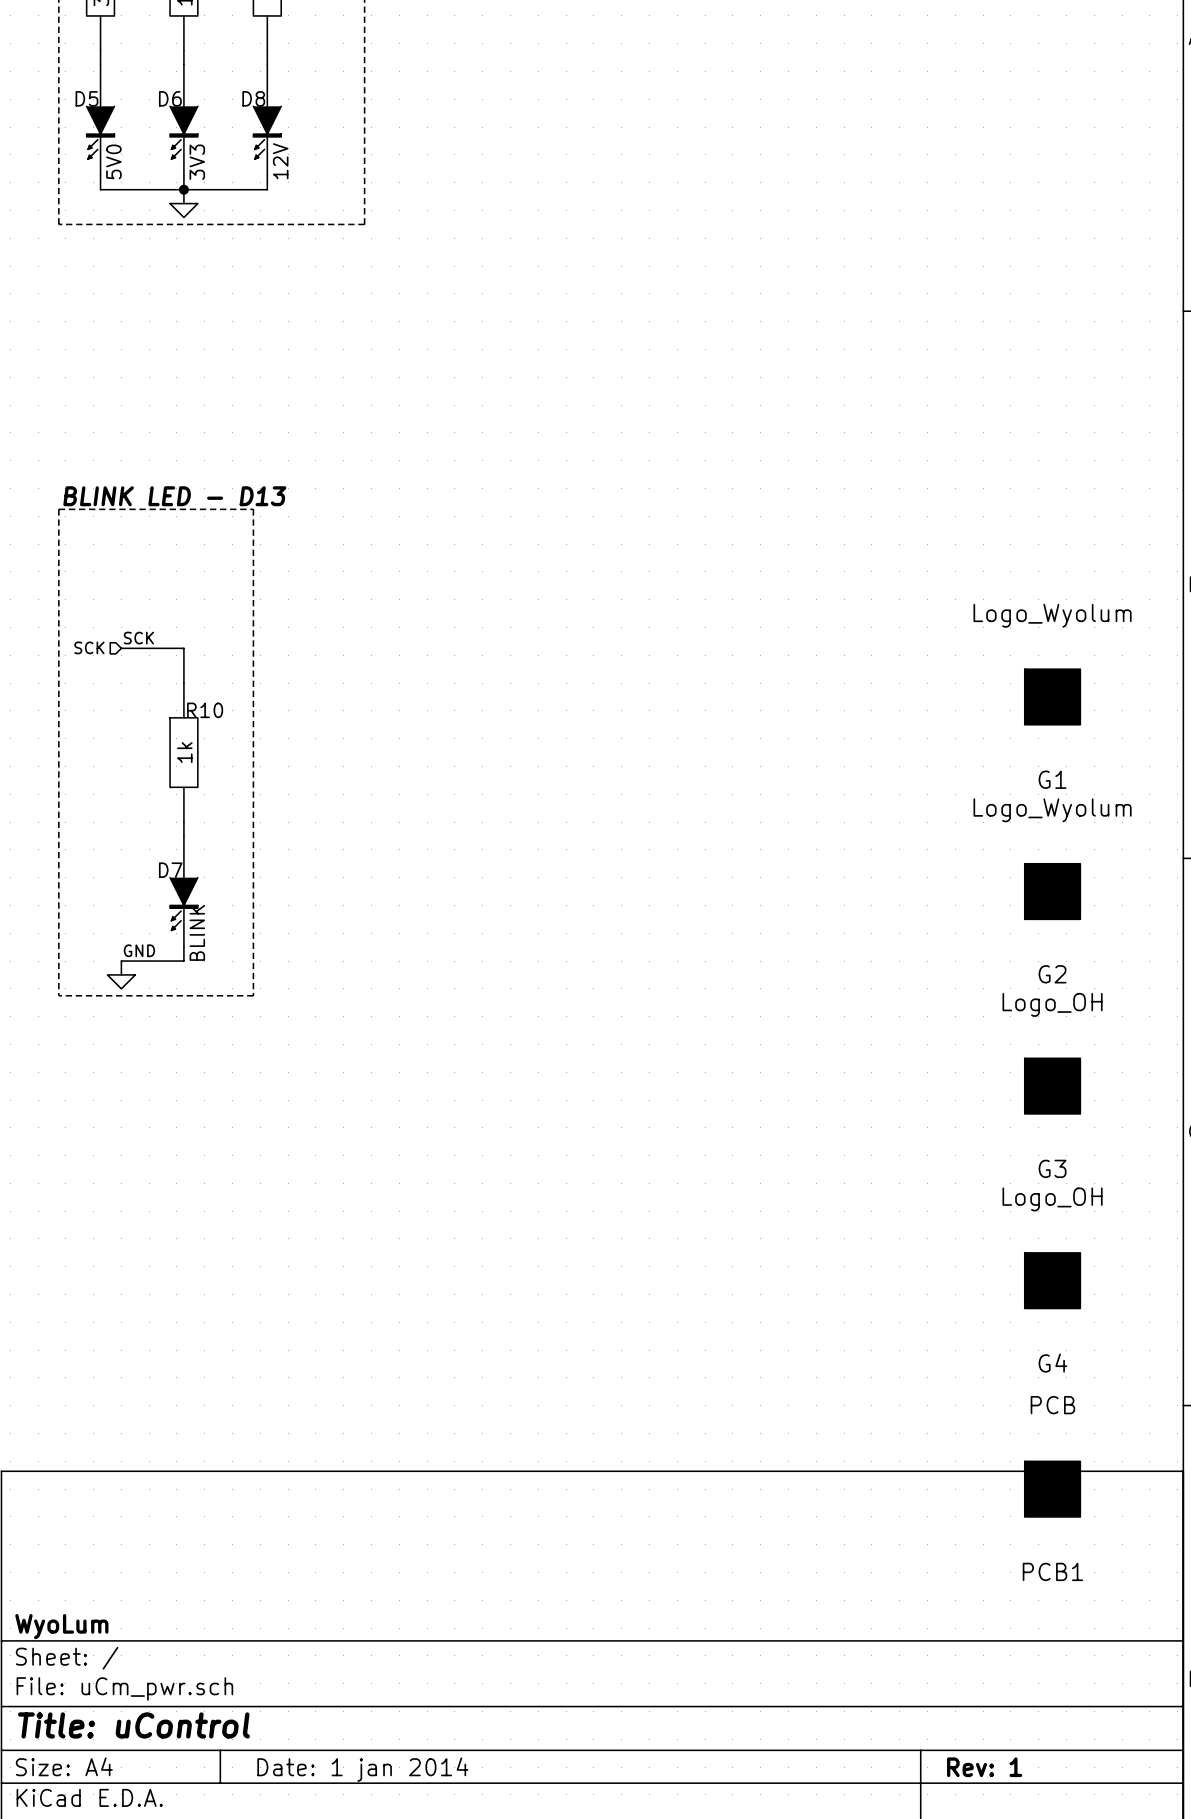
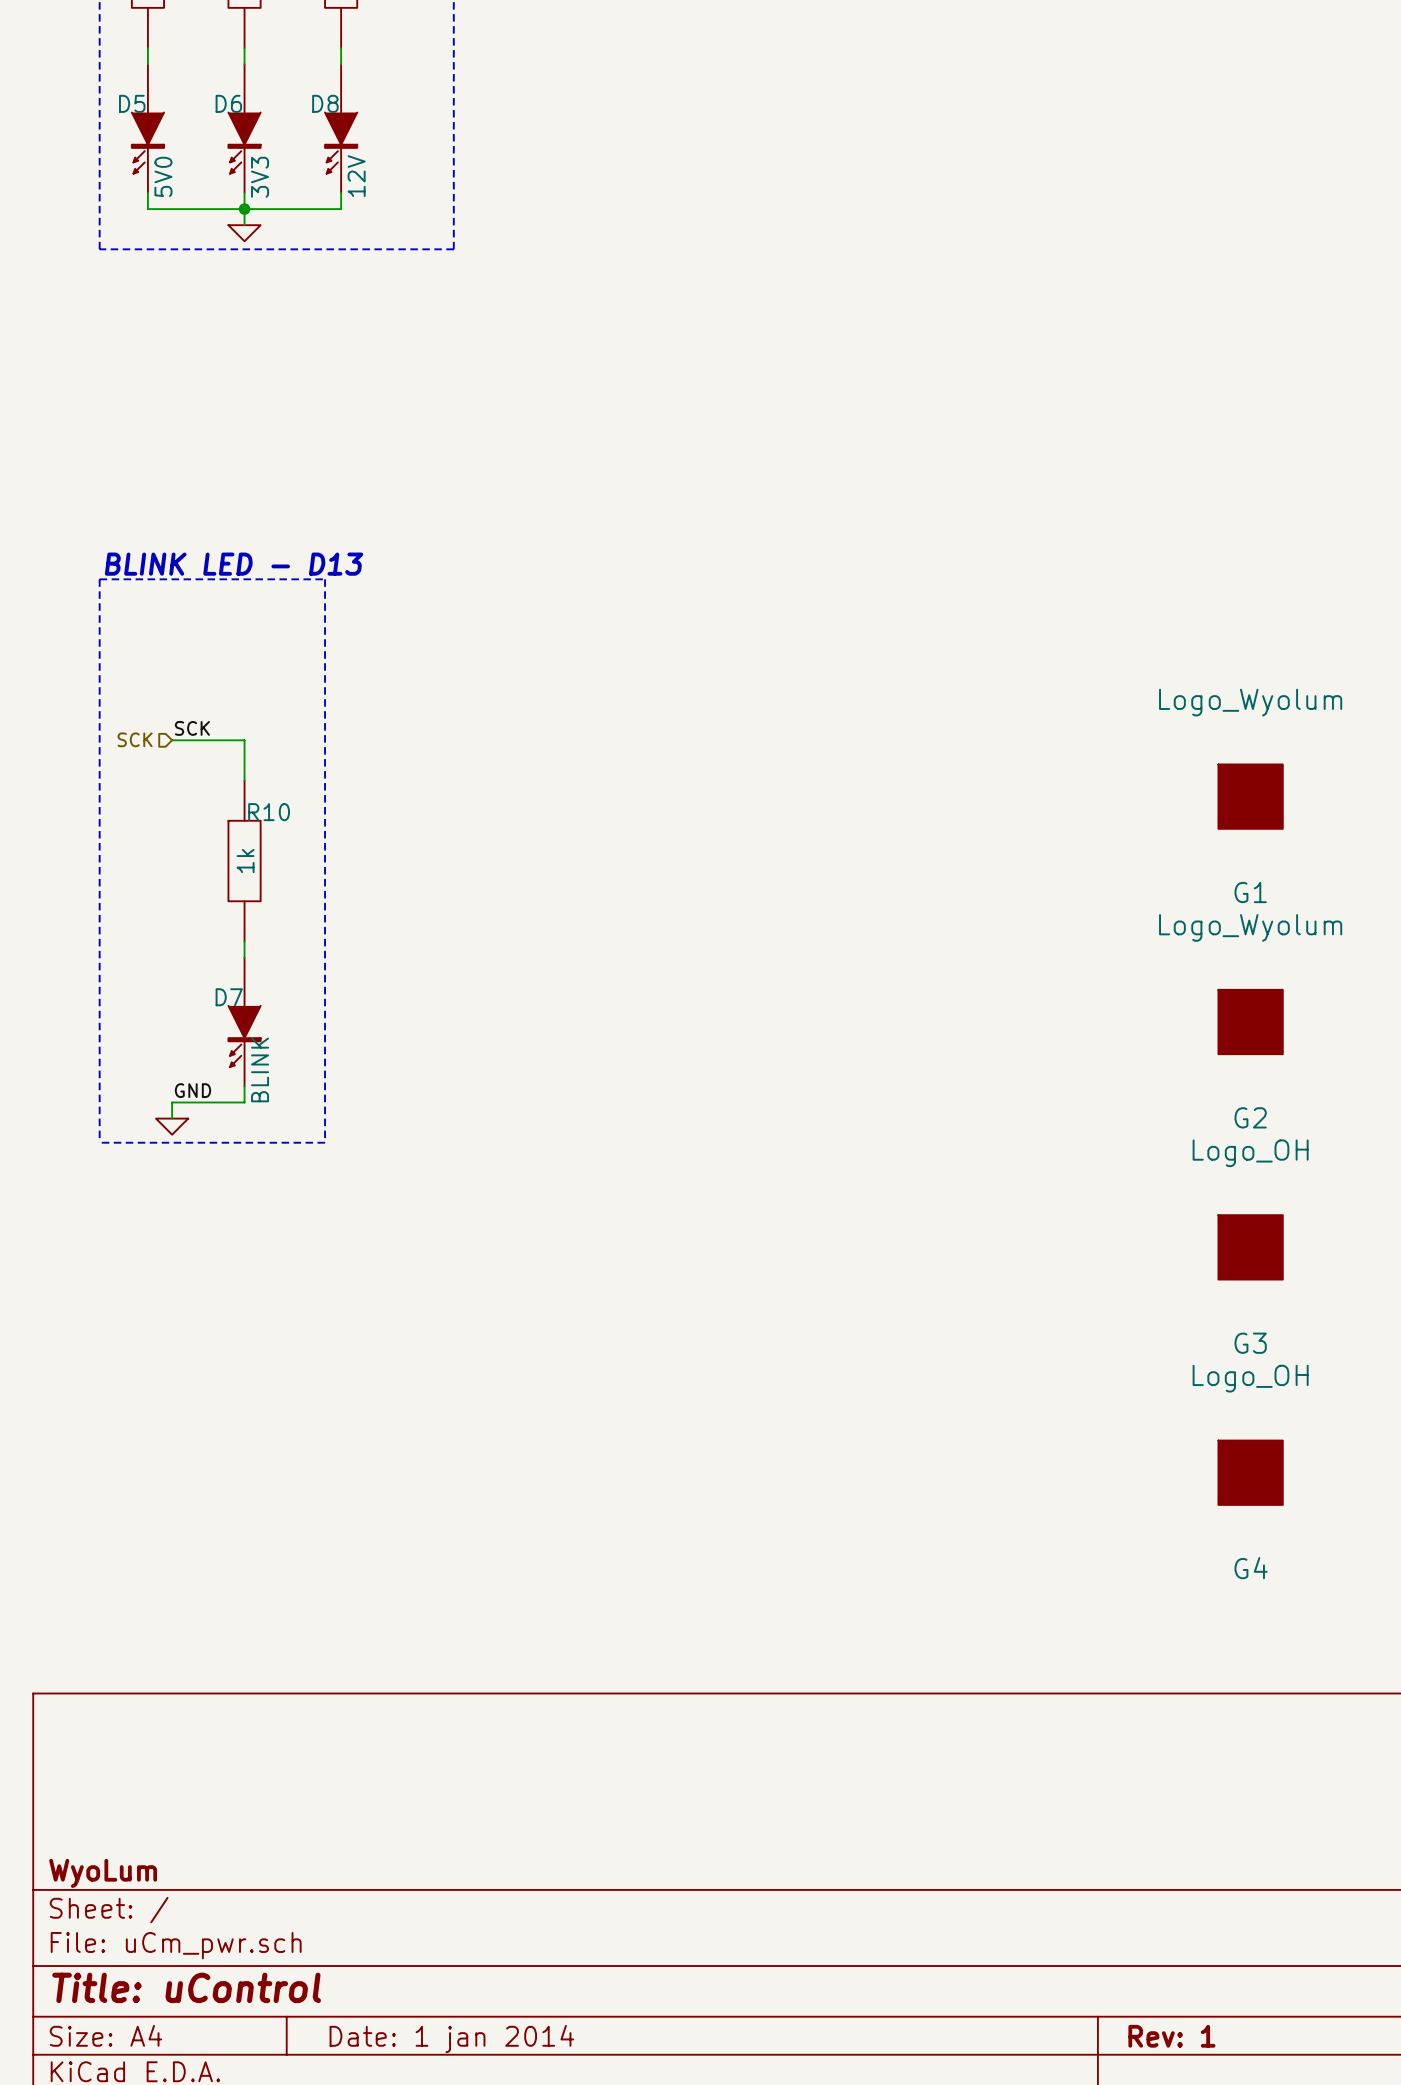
PCB1: PCB (1052, 1489) -> none

